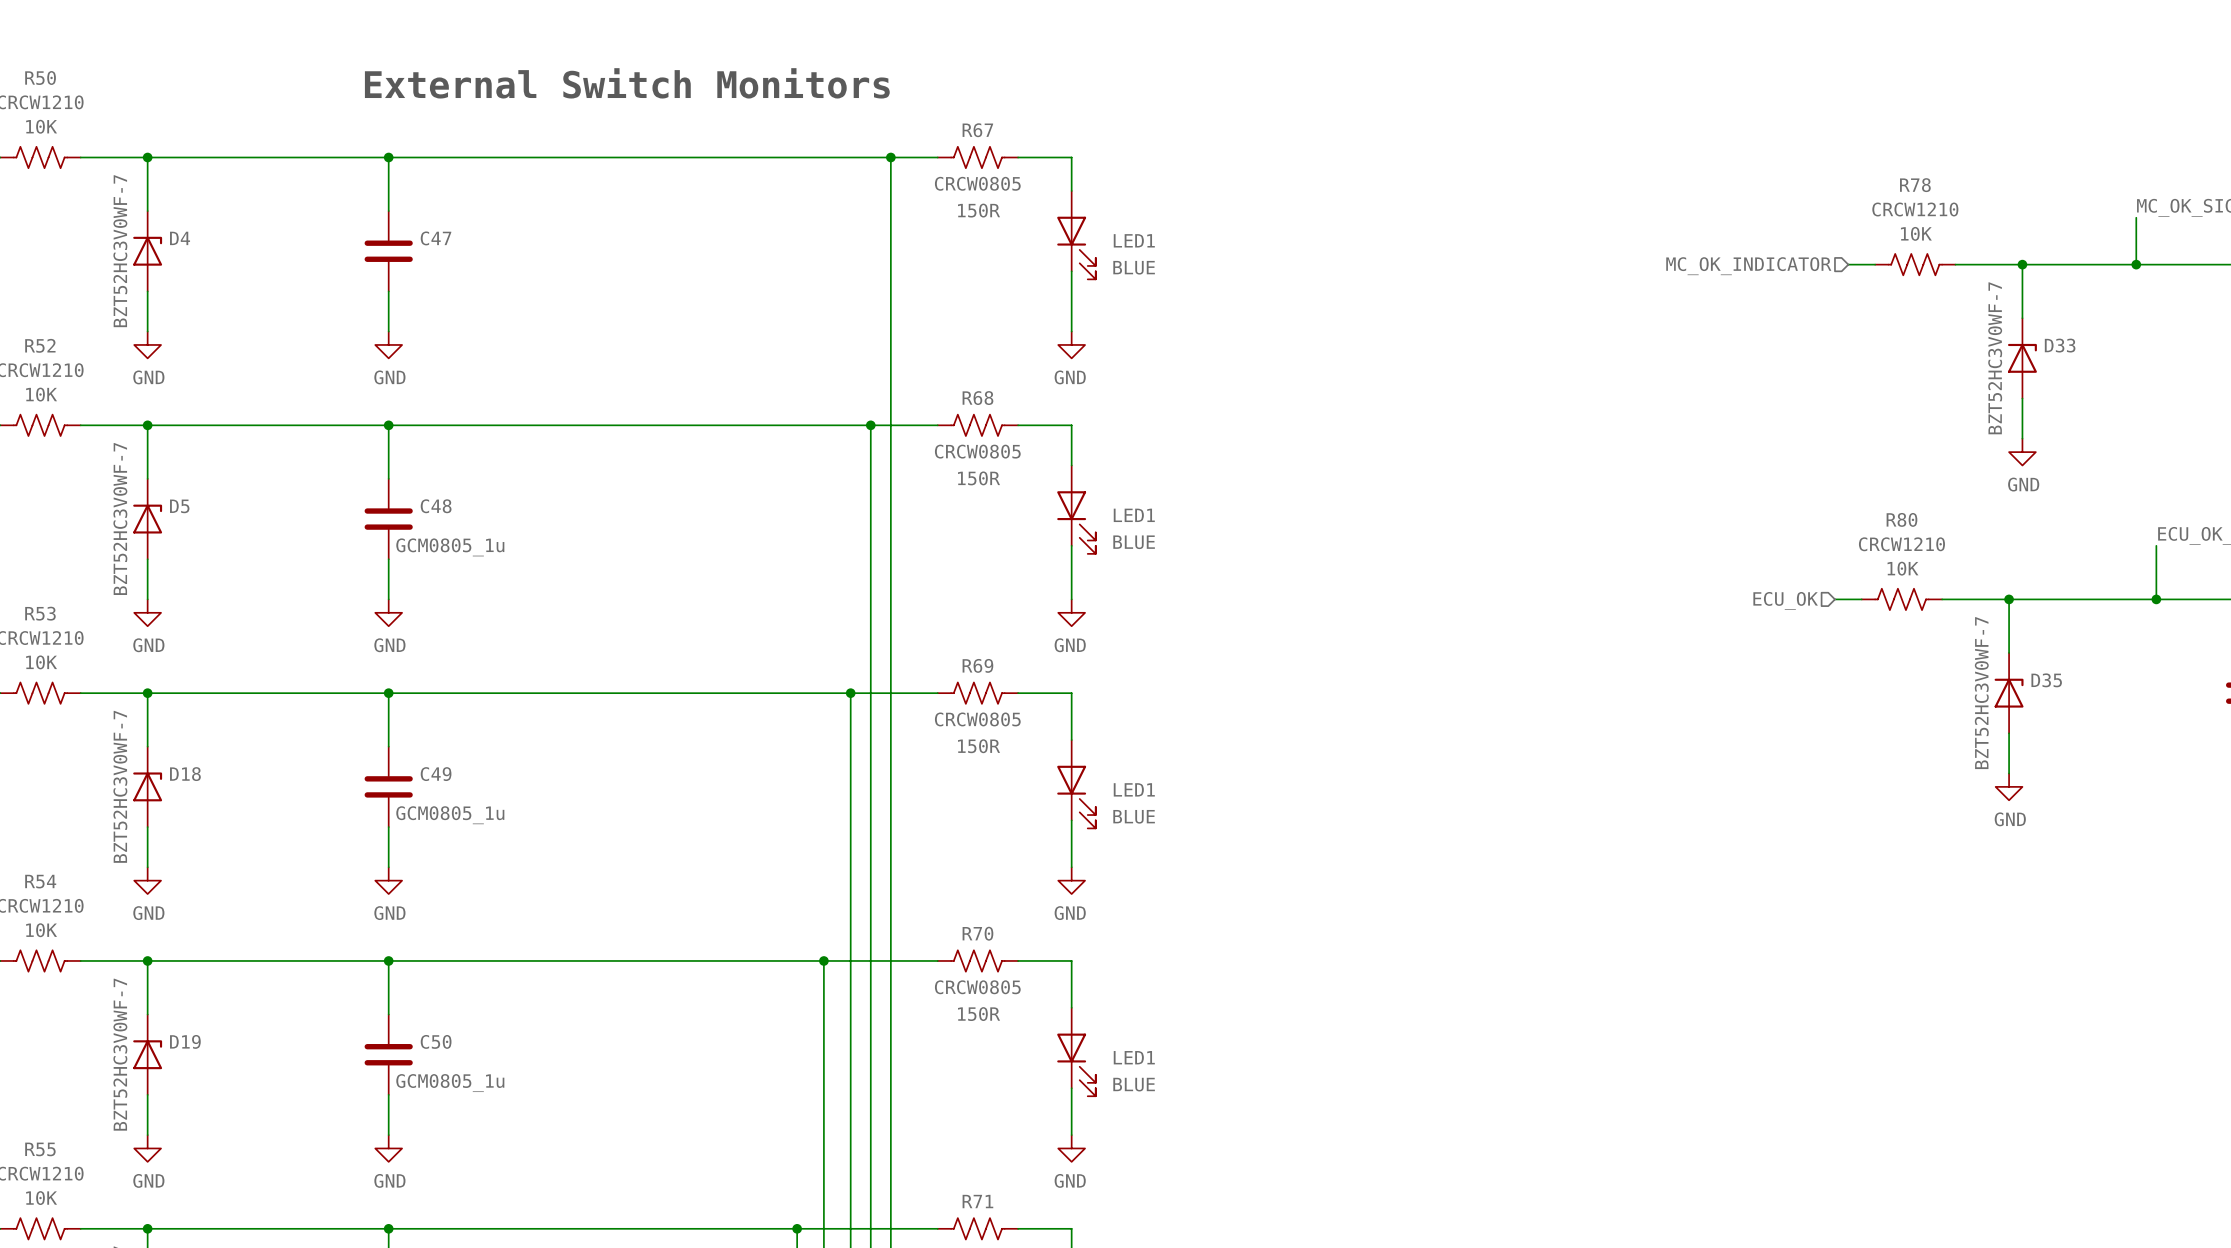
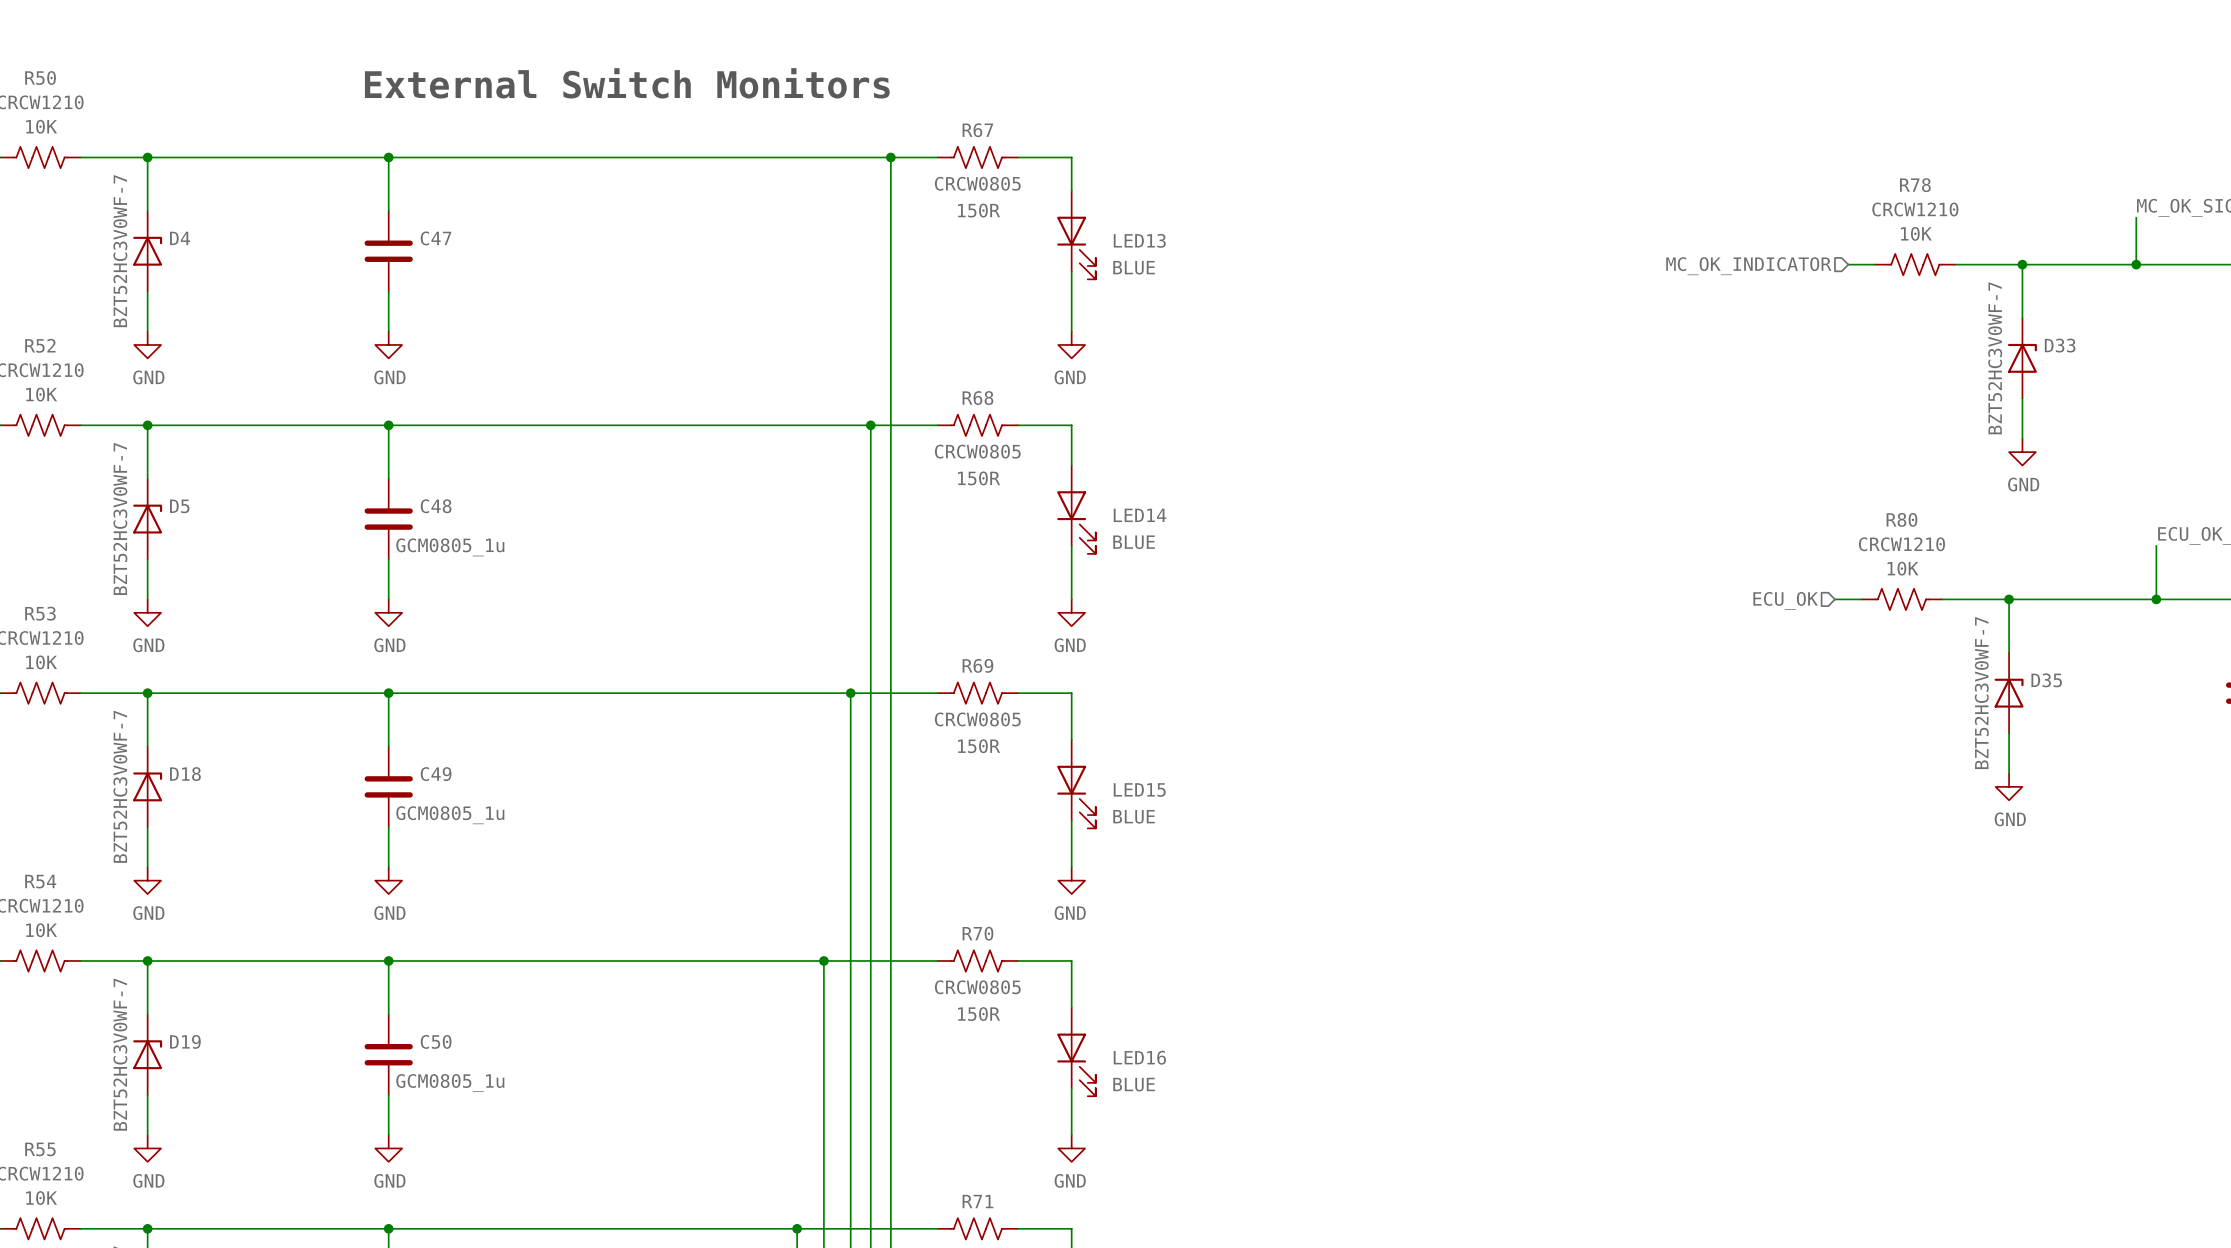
LED1 name: LED1 (1134, 240) -> LED13 (1139, 240)
LED1 name: LED1 (1134, 515) -> LED14 (1140, 515)
LED1 name: LED1 (1134, 789) -> LED15 (1139, 790)
LED1 name: LED1 (1134, 1057) -> LED16 (1139, 1057)

